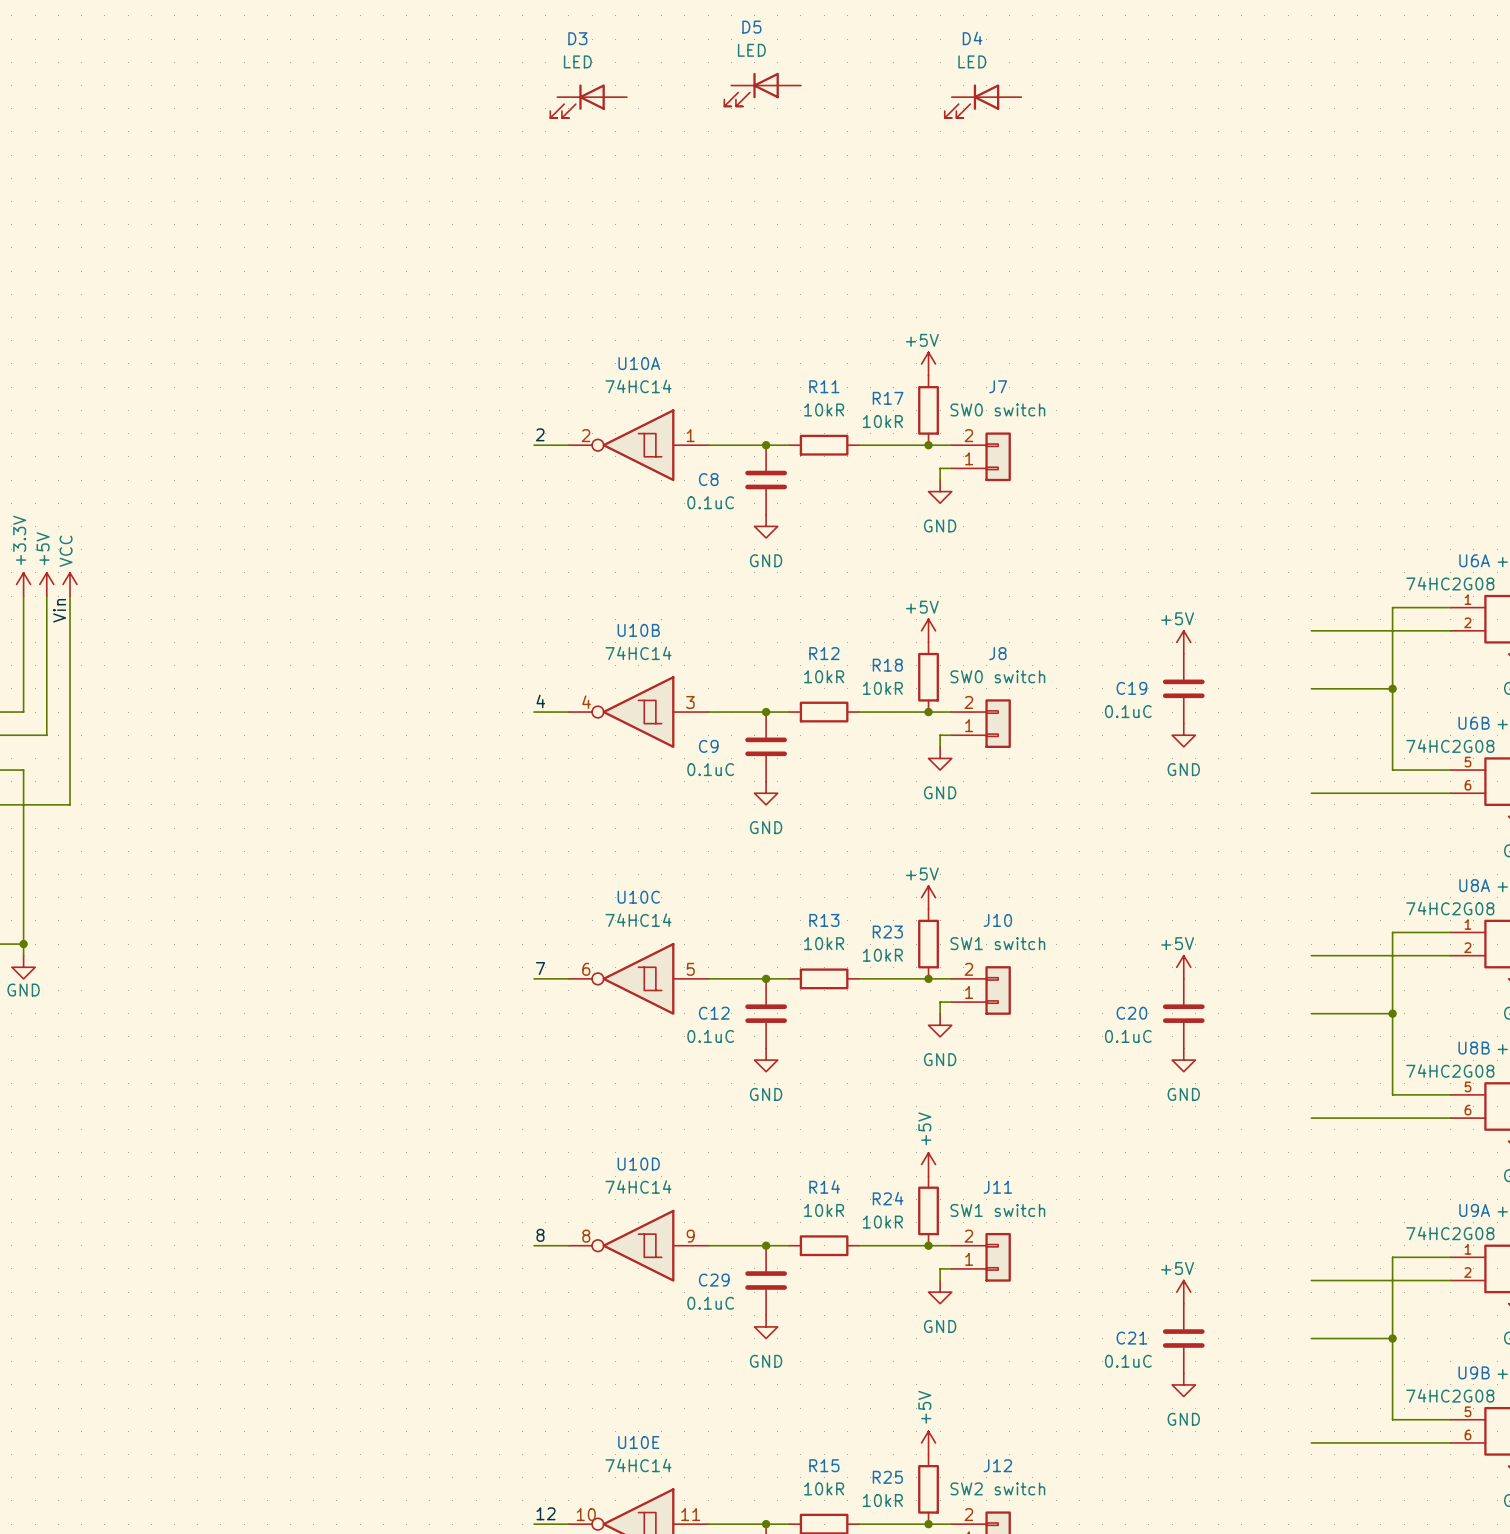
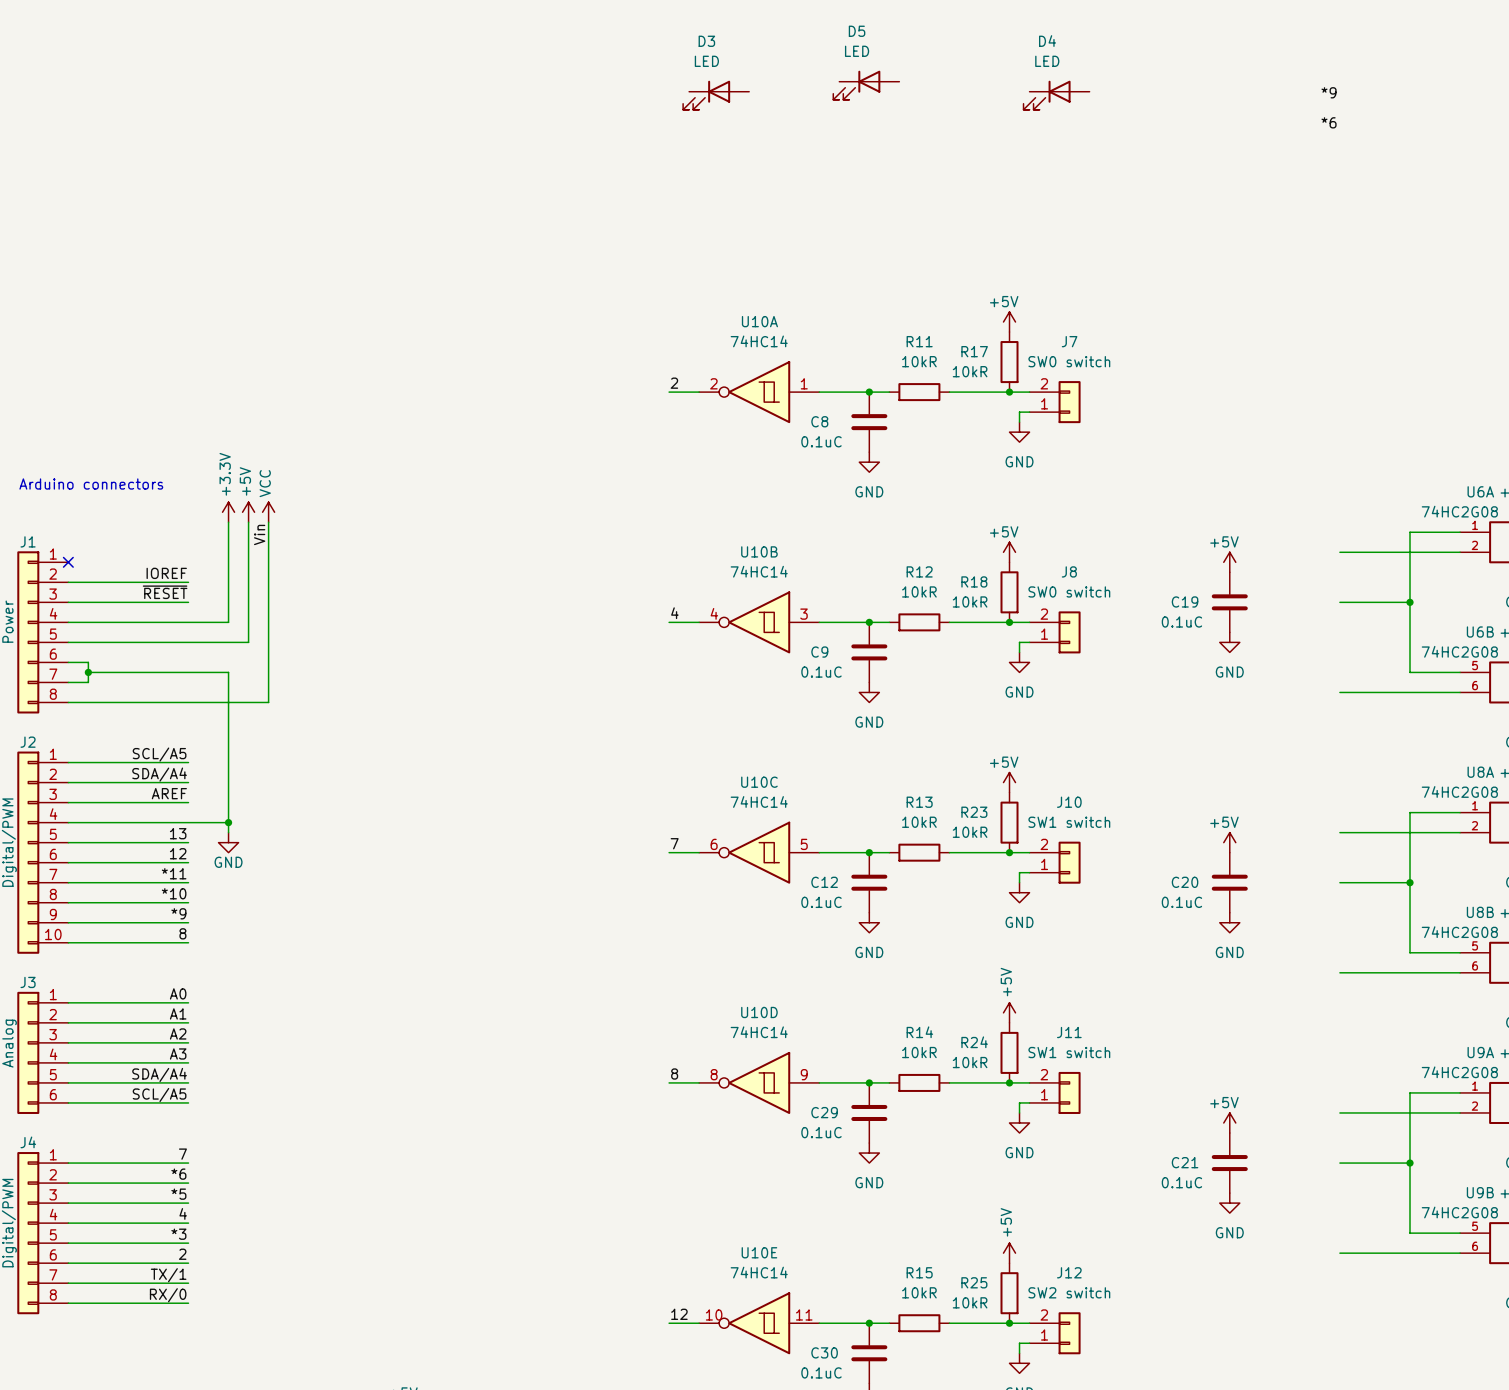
label: none -> *9 (1329, 92)
label: none -> *6 (1329, 122)

